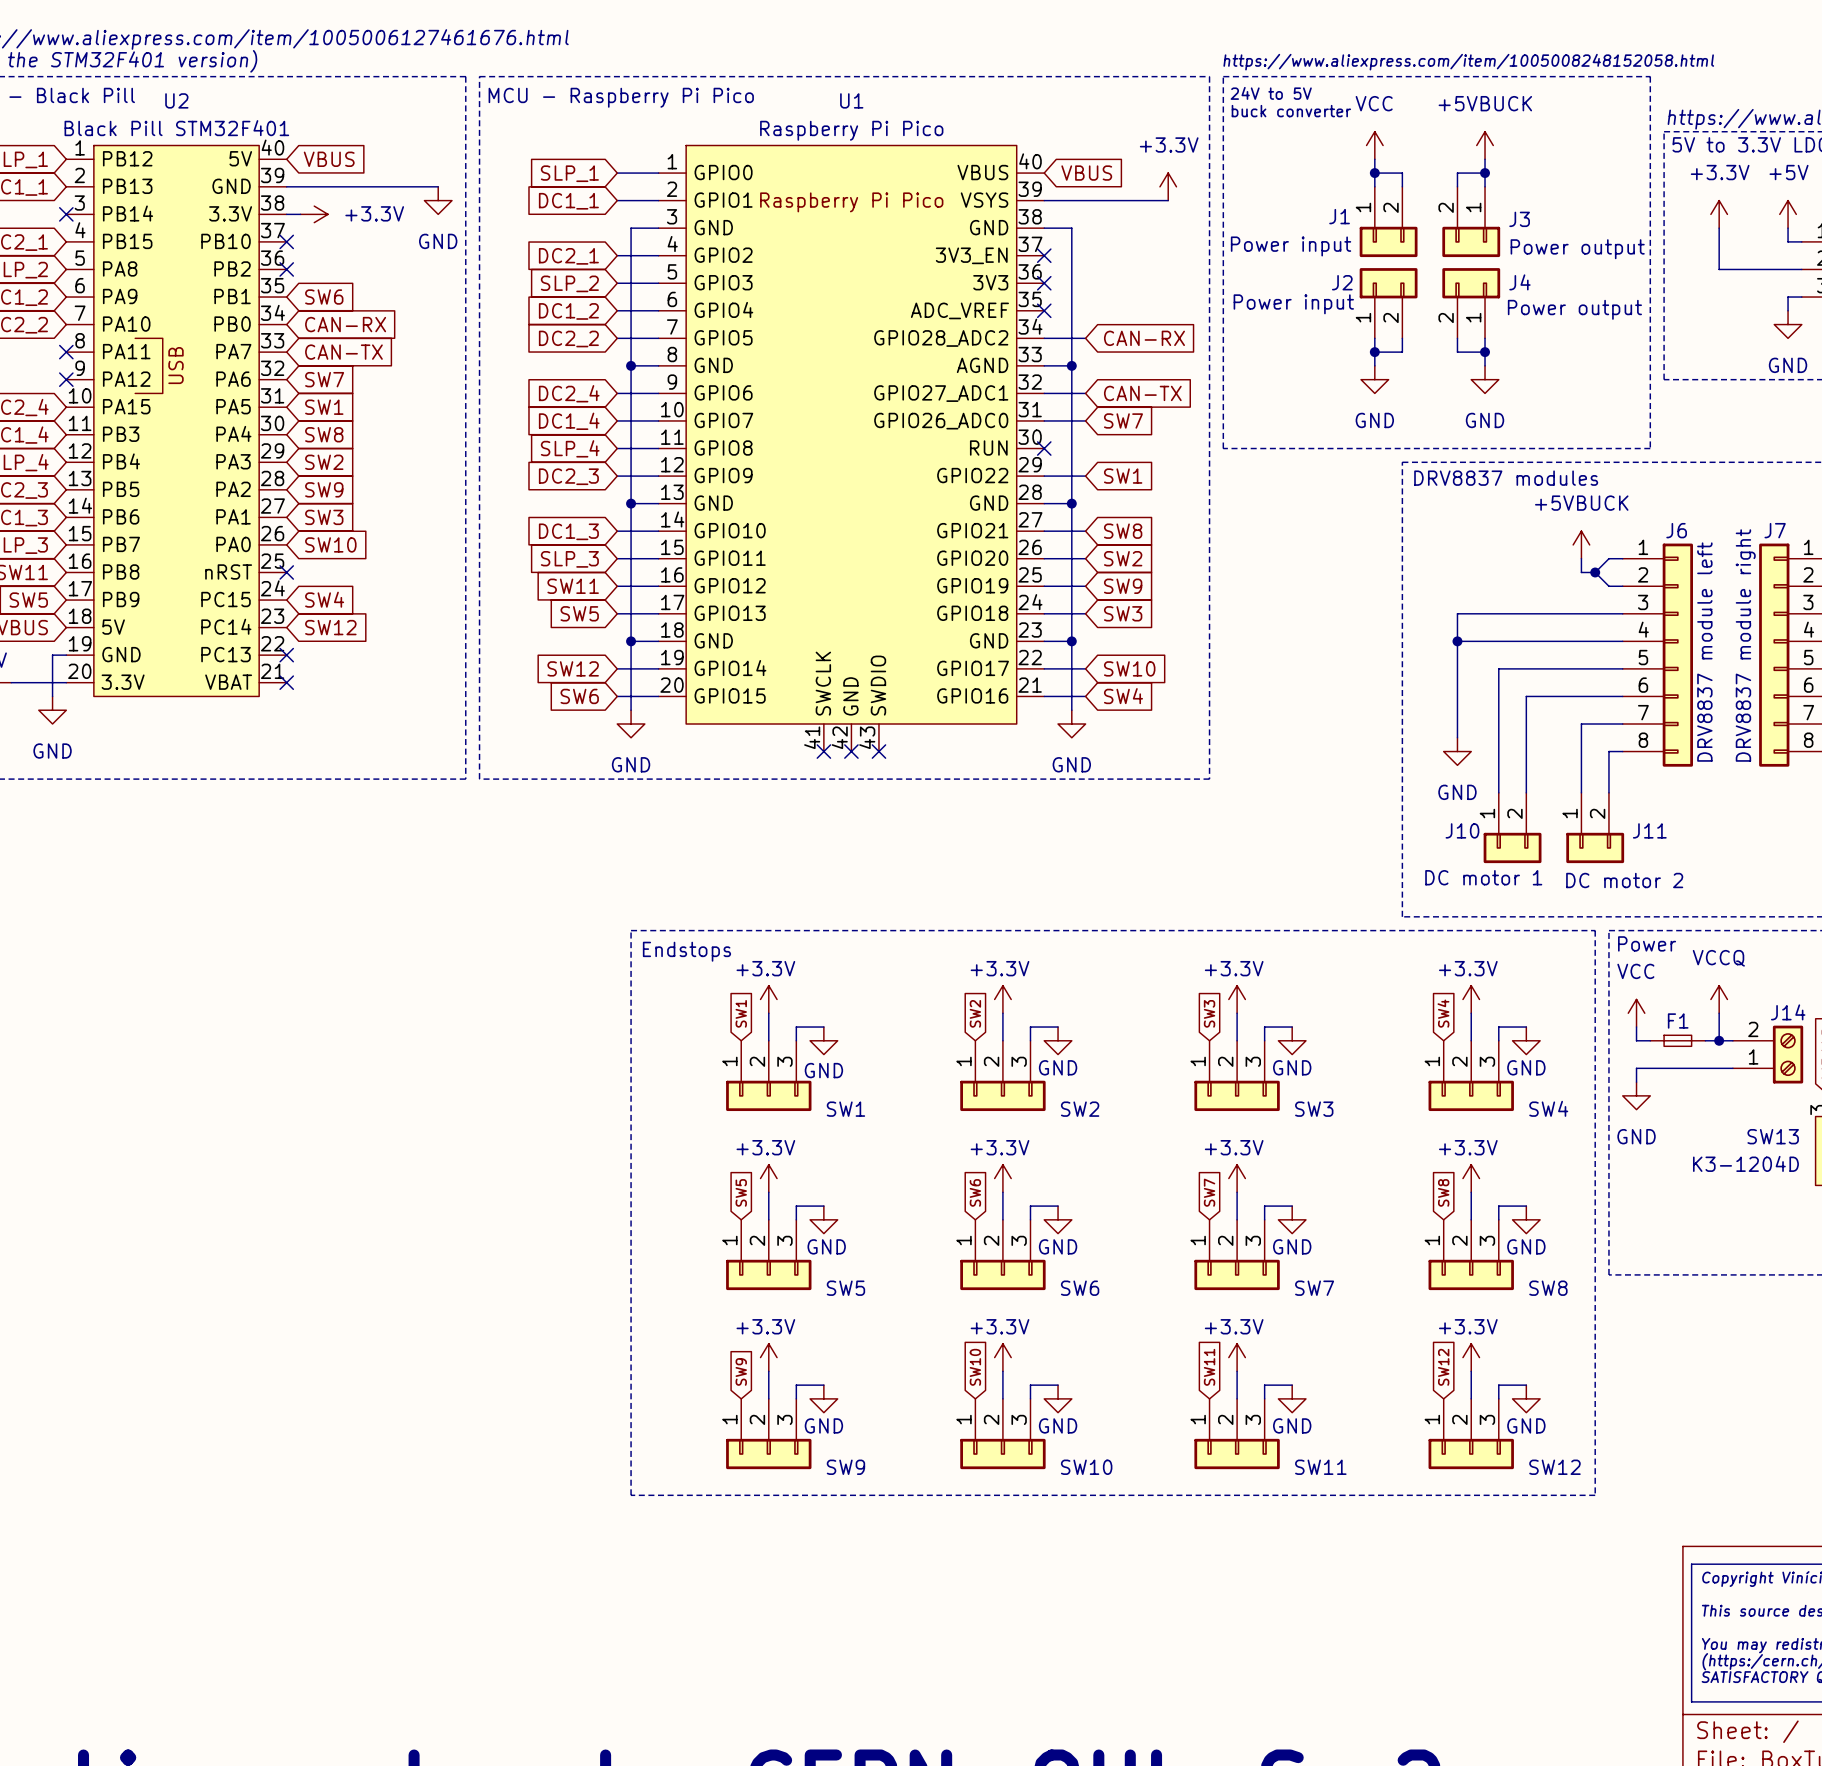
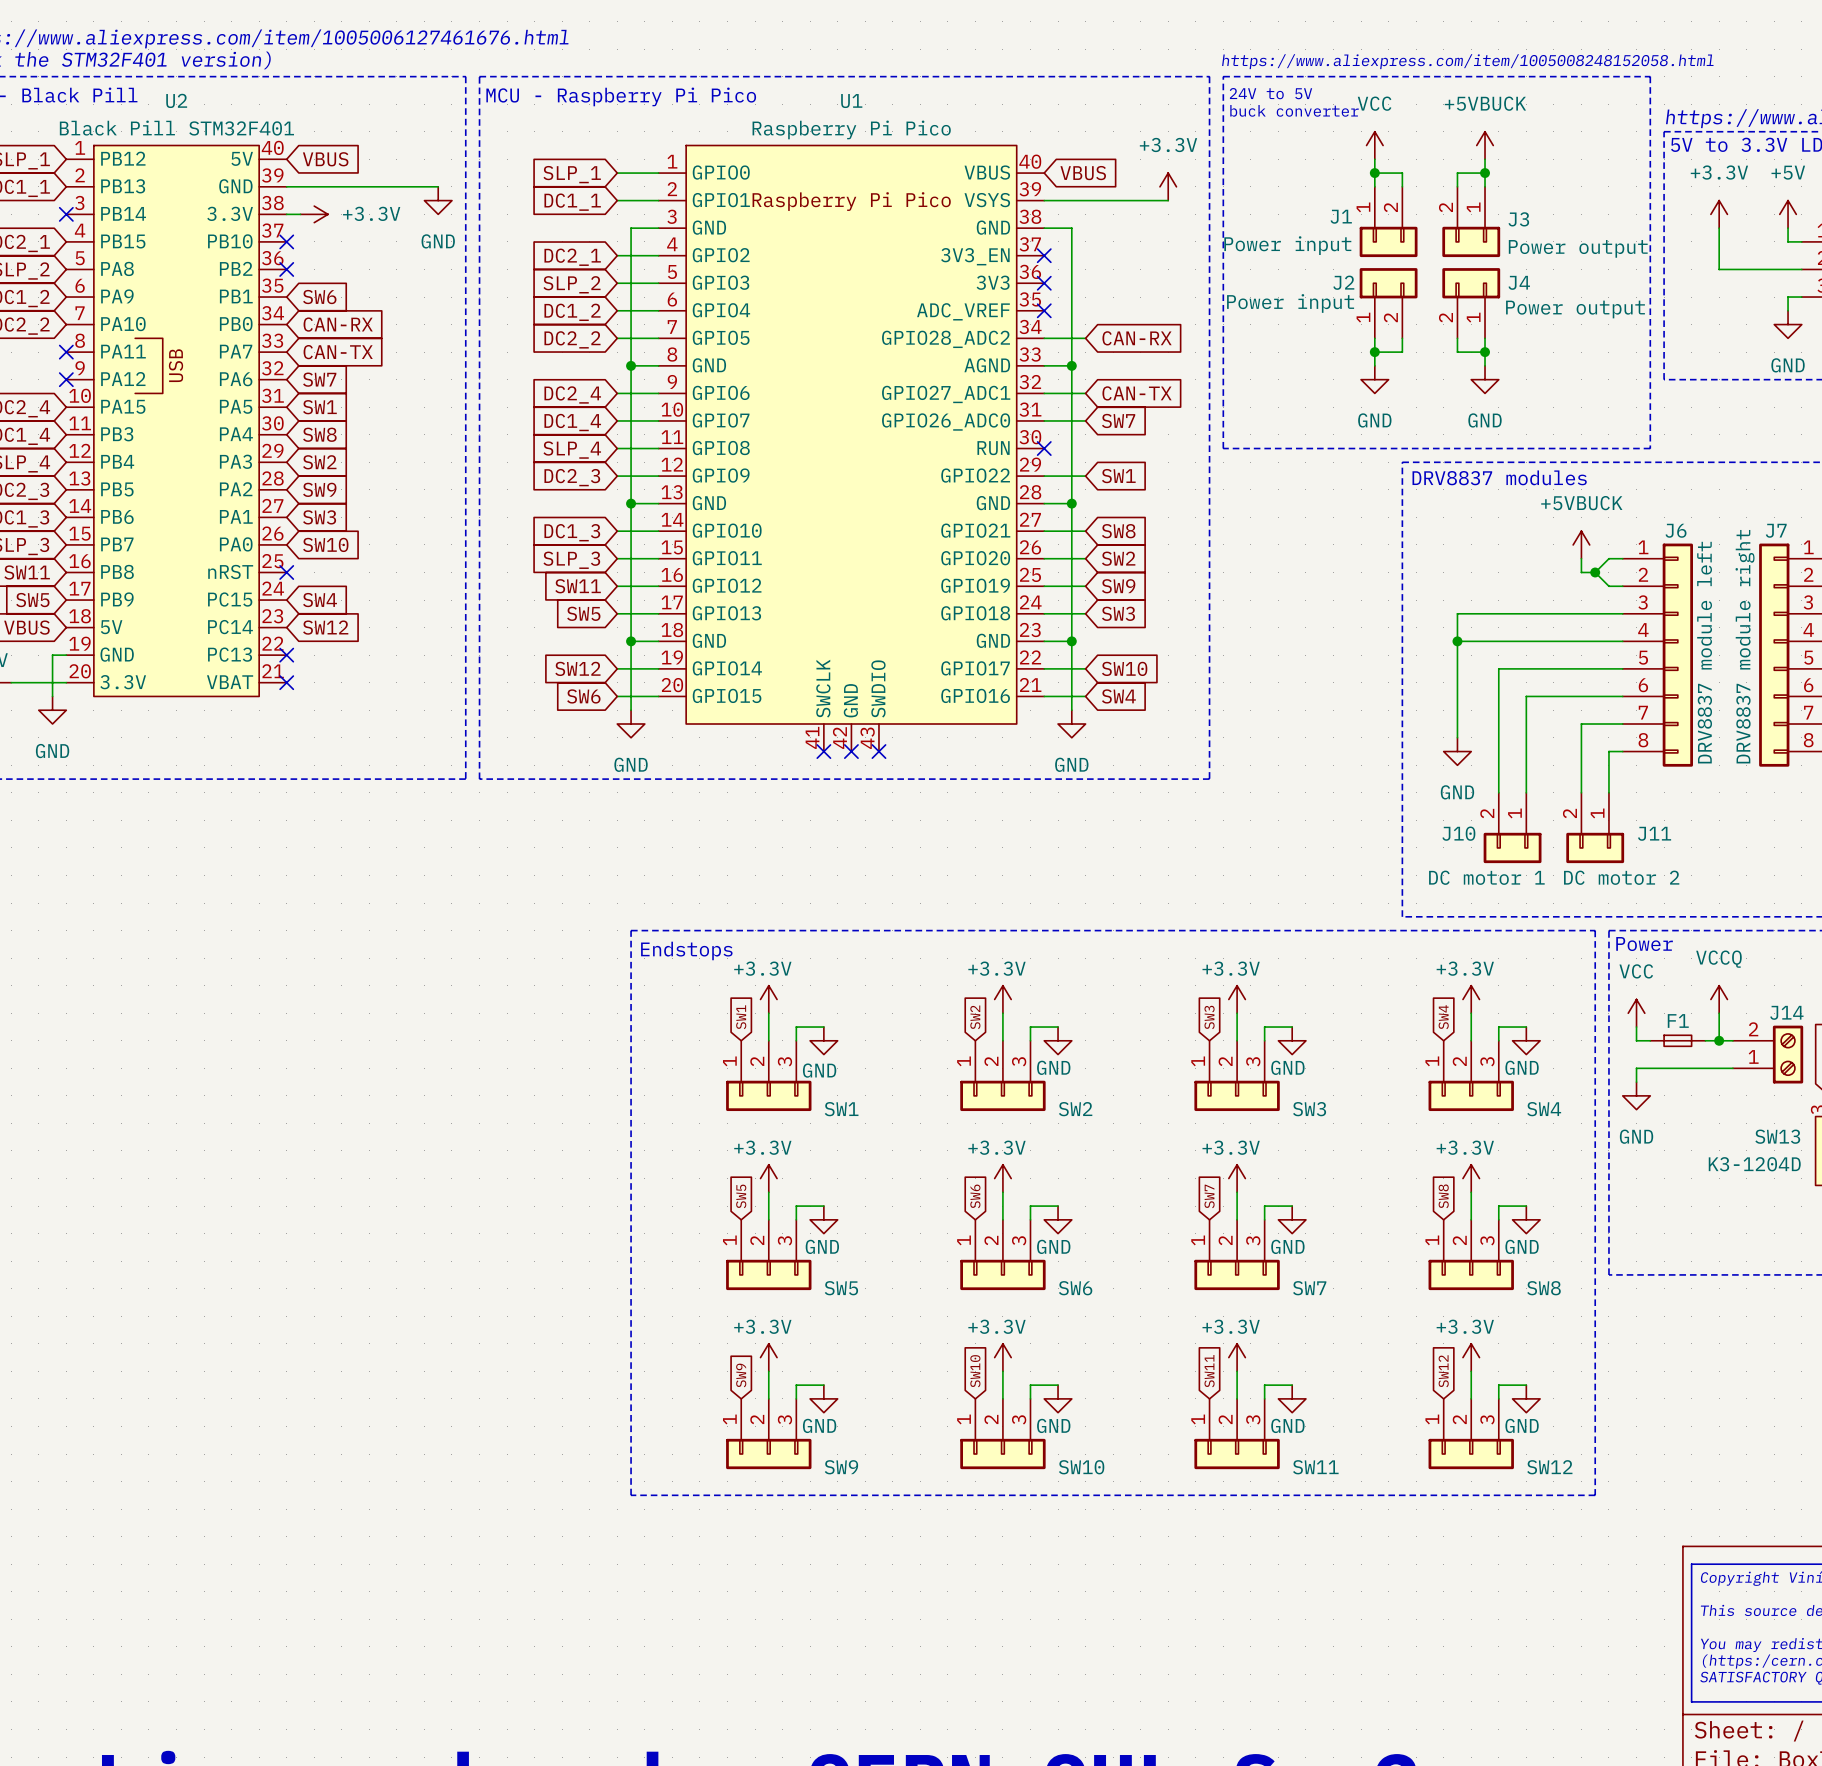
J10 flip: as is (1512, 847) -> left-right (1512, 847)
J11 flip: as is (1595, 847) -> left-right (1595, 847)
J10 value position: DC motor 1 (1483, 877) -> DC motor 1 (1486, 877)
J11 value position: DC motor 2 (1624, 880) -> DC motor 2 (1621, 877)

